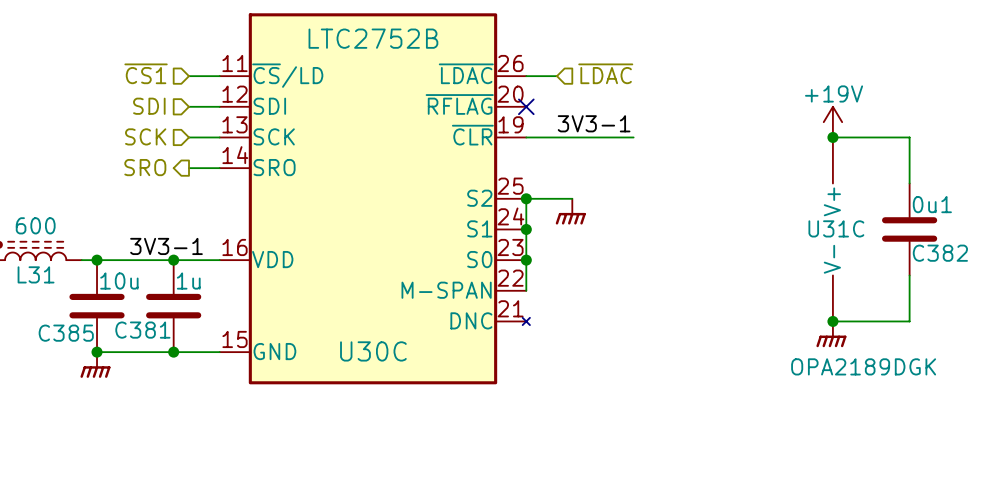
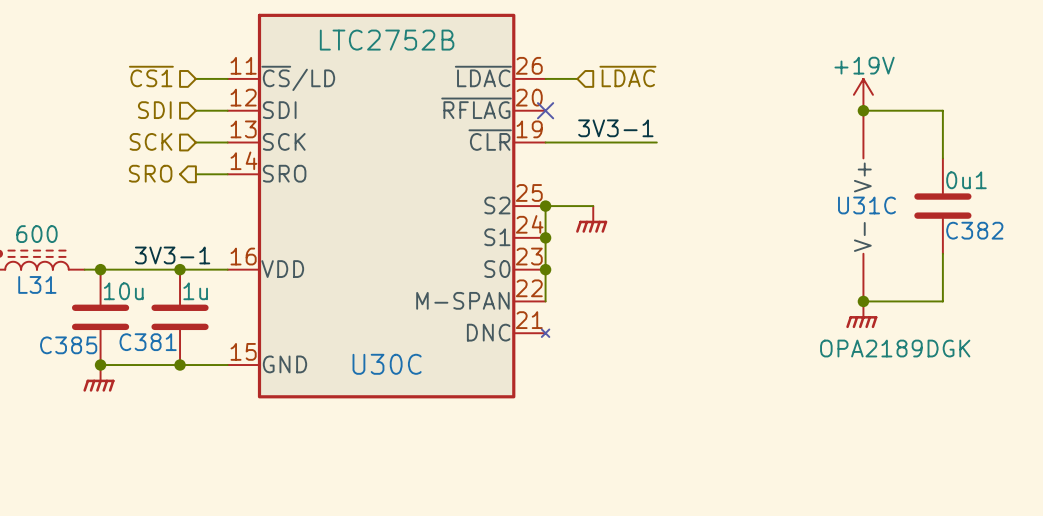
power symbol position: +19V (832, 122) -> +19V (863, 94)
wire: (832, 137) (909, 137) -> (863, 110) (942, 110) (942, 142)
junction position: (832, 137) -> (863, 110)
U31C position: (832, 229) -> (863, 206)
C382 position: (909, 229) -> (942, 206)
wire: (909, 290) (909, 321) (832, 321) -> (942, 301) (863, 301)
junction position: (832, 321) -> (863, 301)
power symbol position: (831, 334) -> (861, 314)

